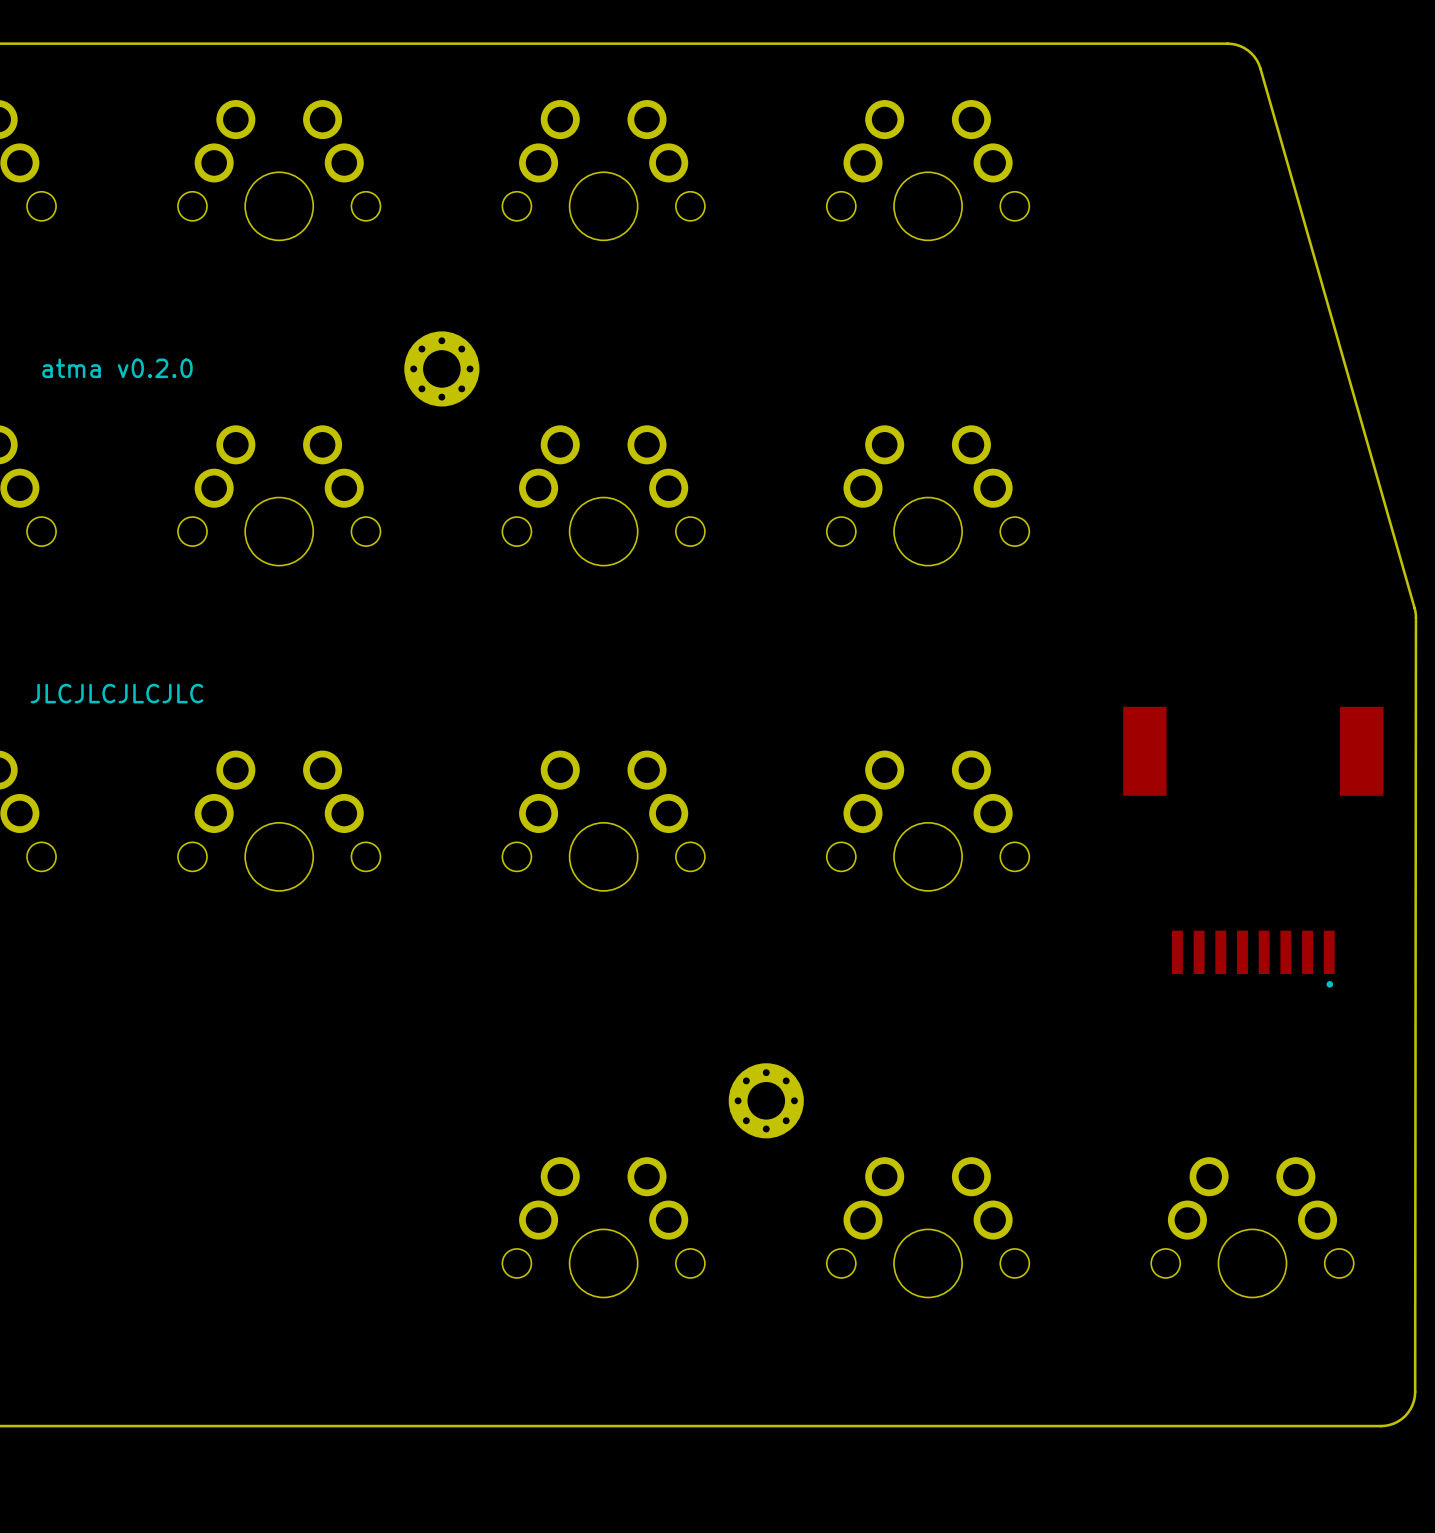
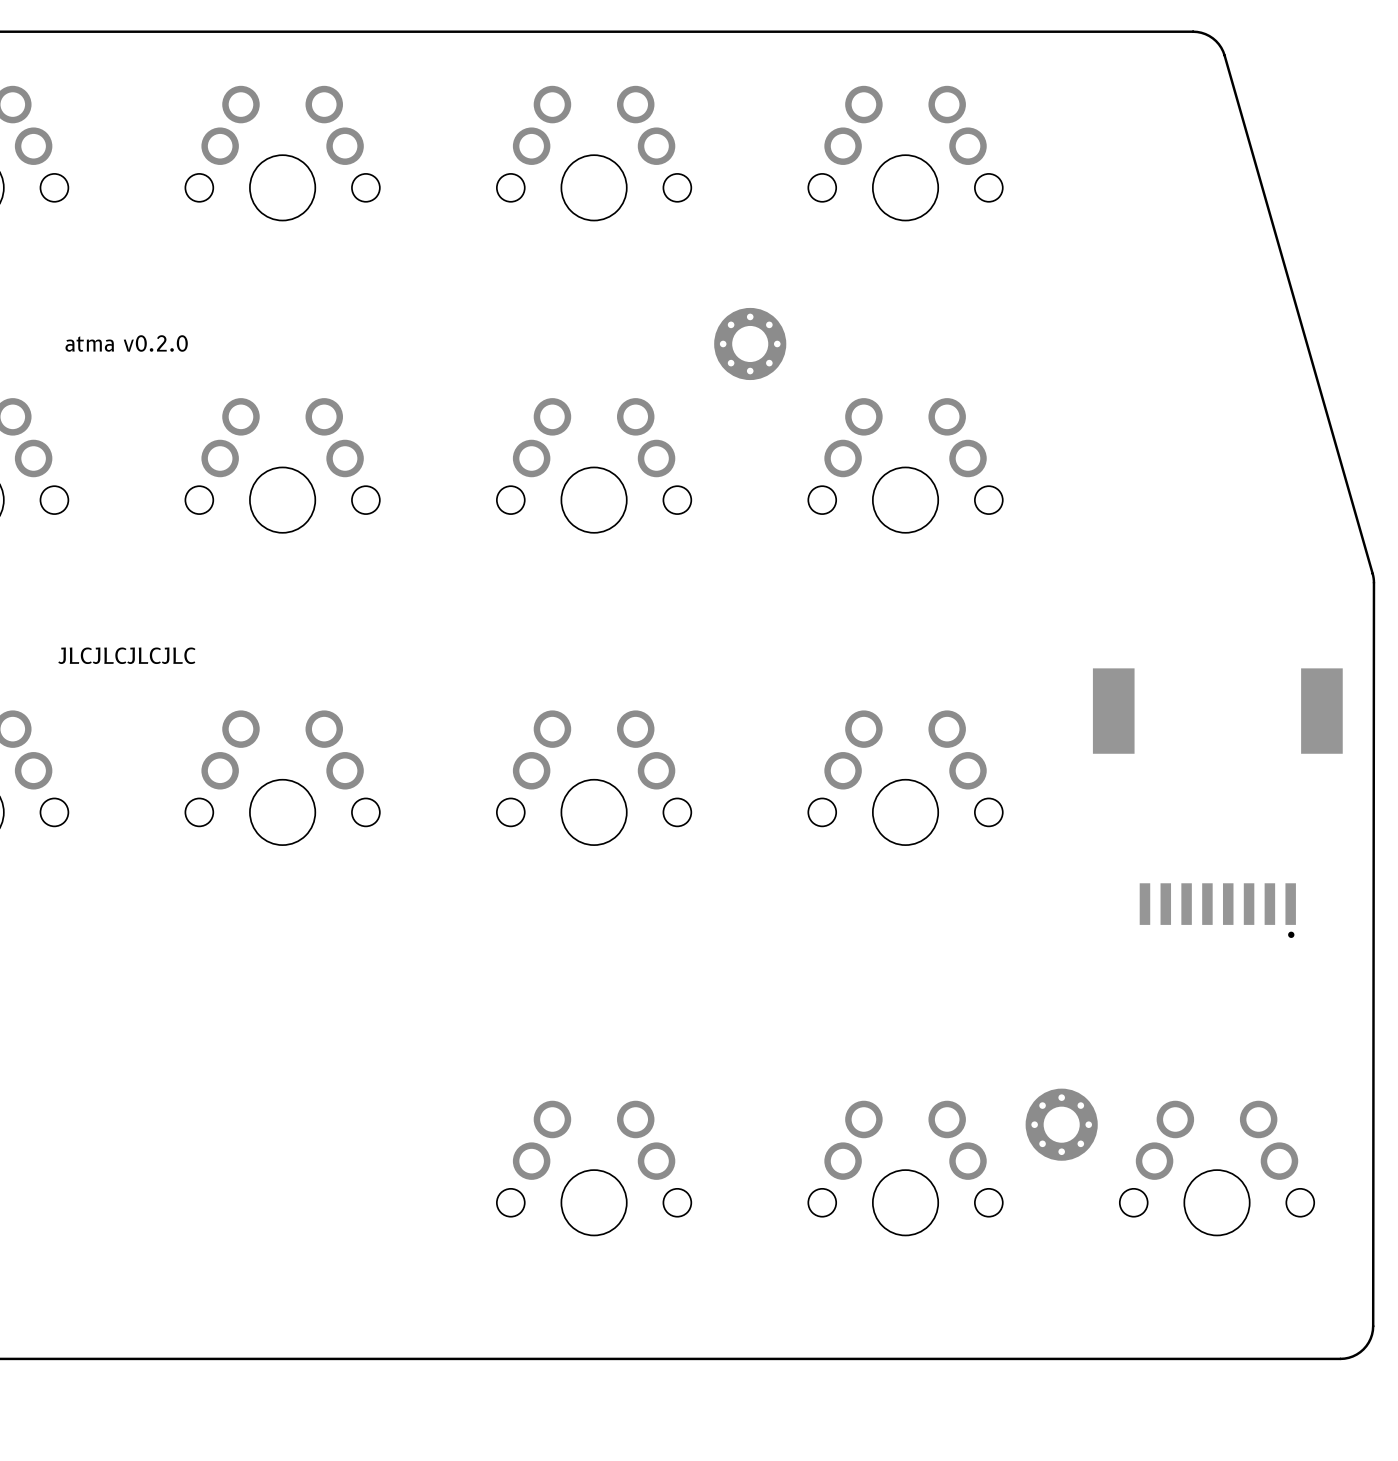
part position: (441, 368) -> (750, 343)
part position: (766, 1100) -> (1061, 1124)

